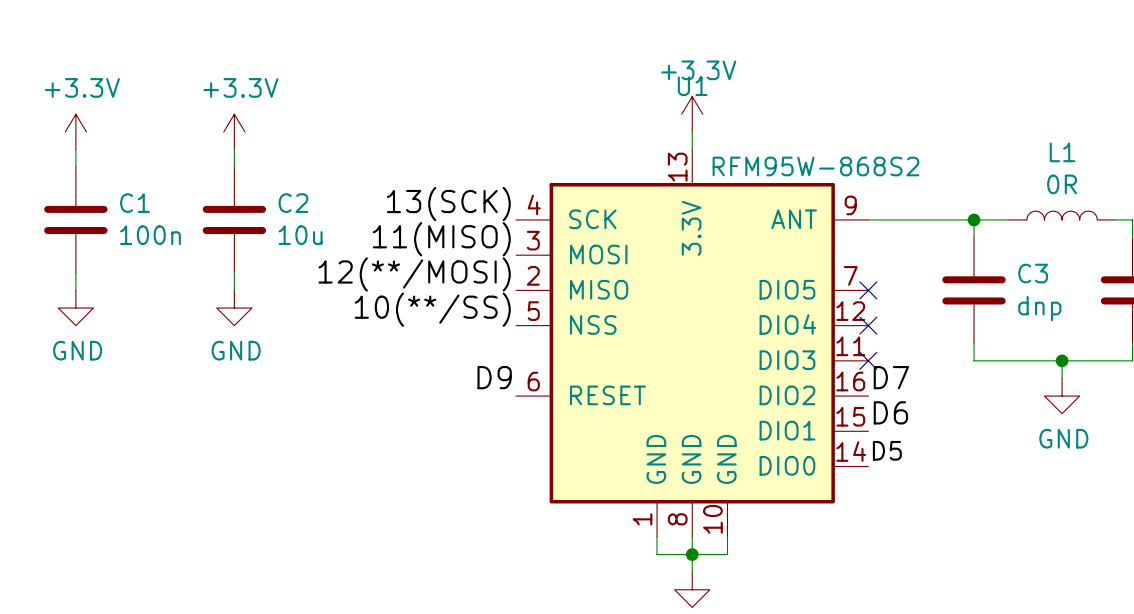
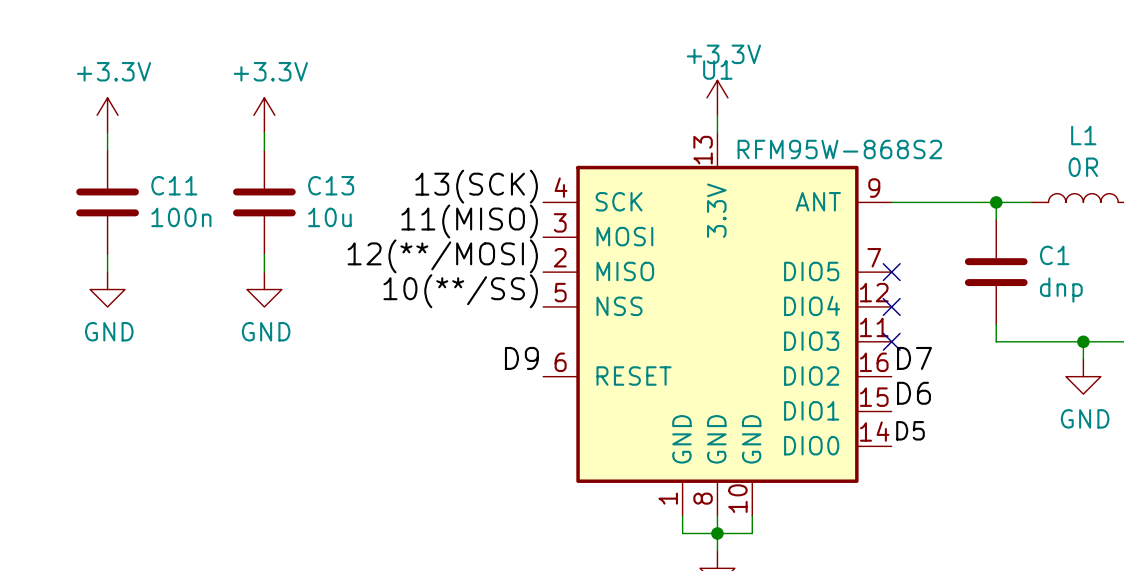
C1 name: C1 (134, 203) -> C11 (174, 185)
C2 name: C2 (293, 203) -> C13 (331, 185)
C3 name: C3 (1033, 273) -> C1 (1054, 255)

